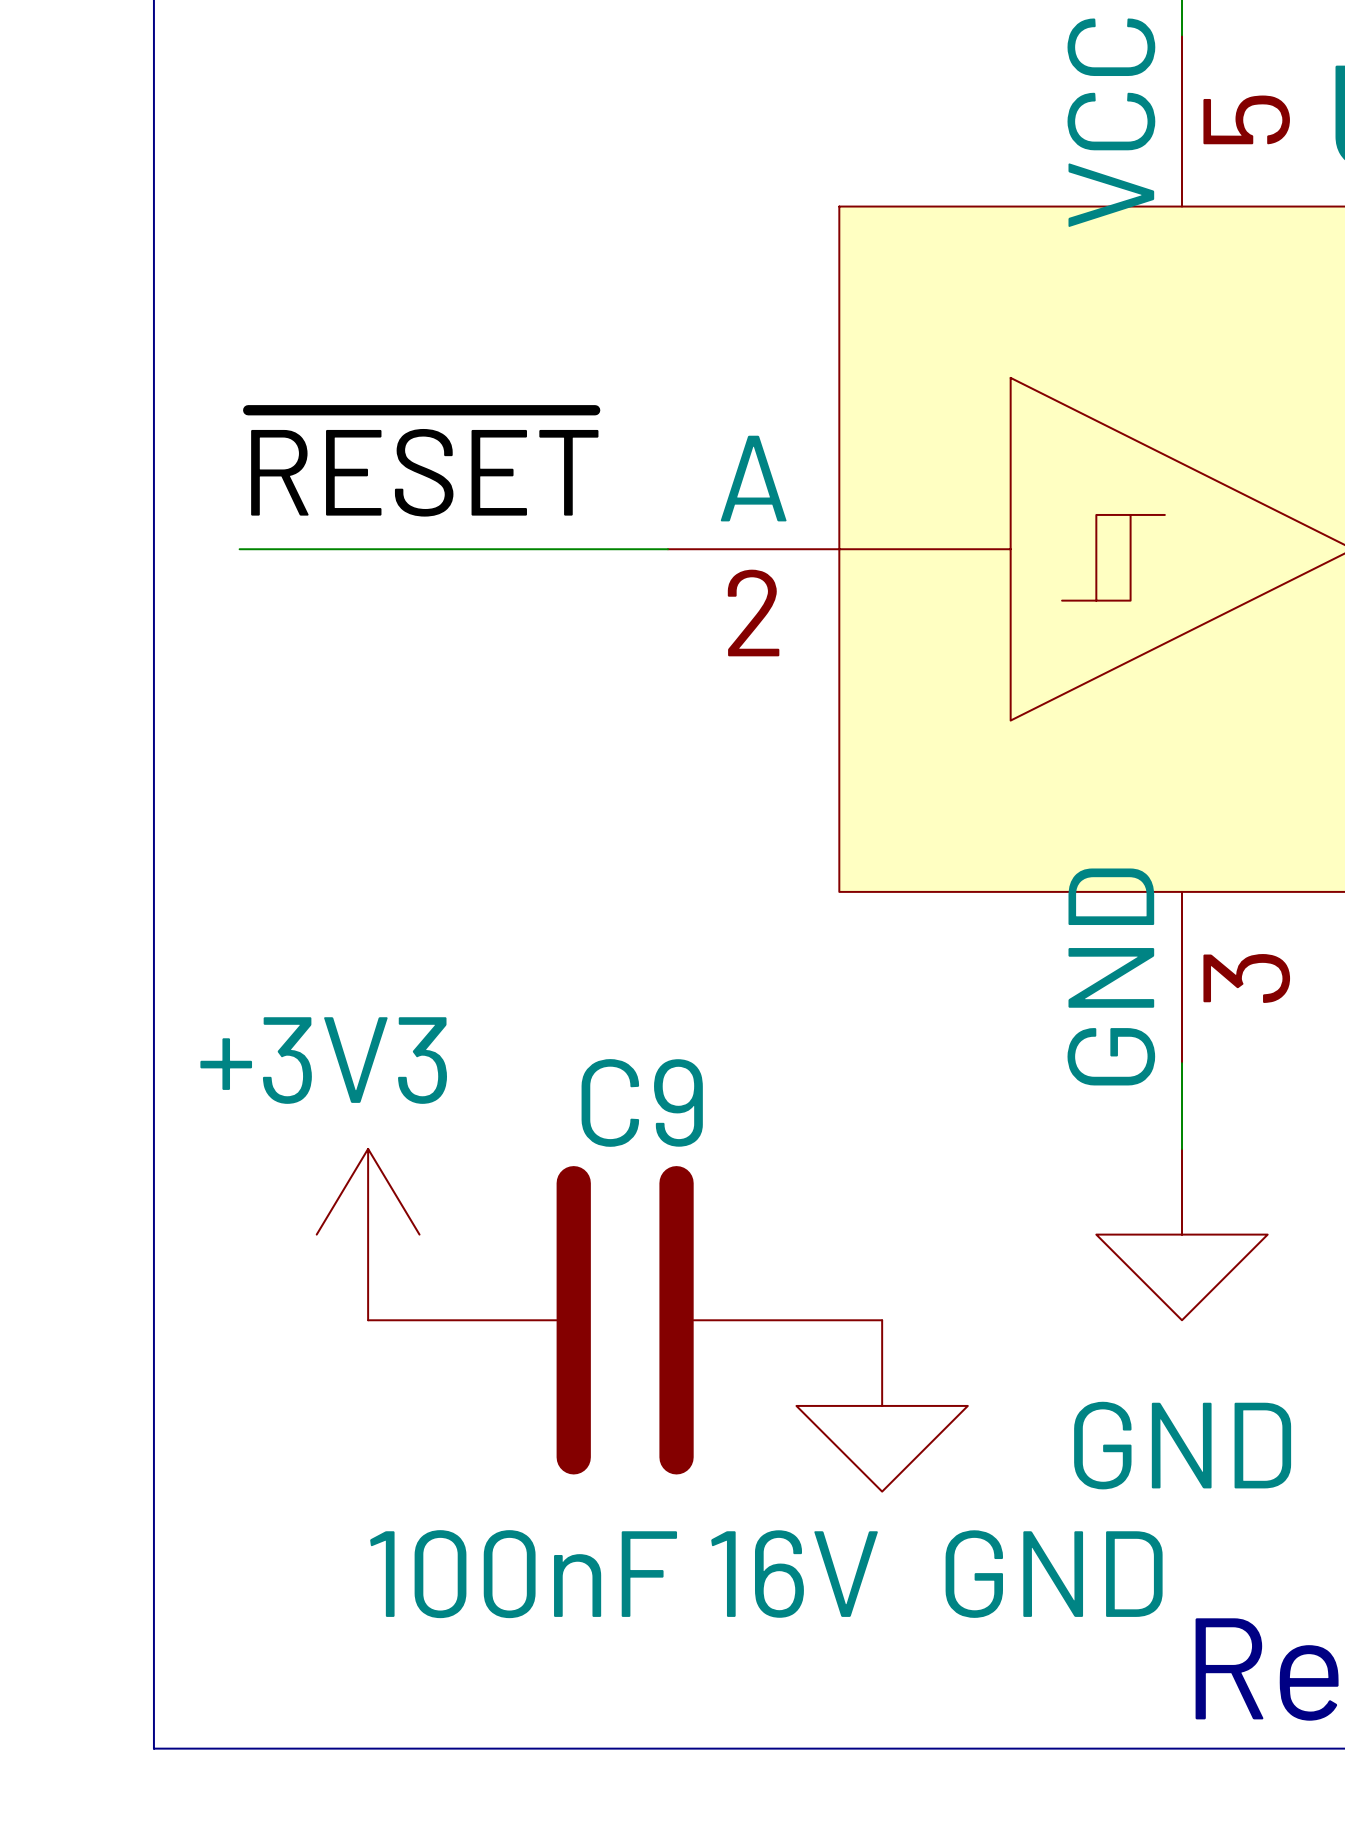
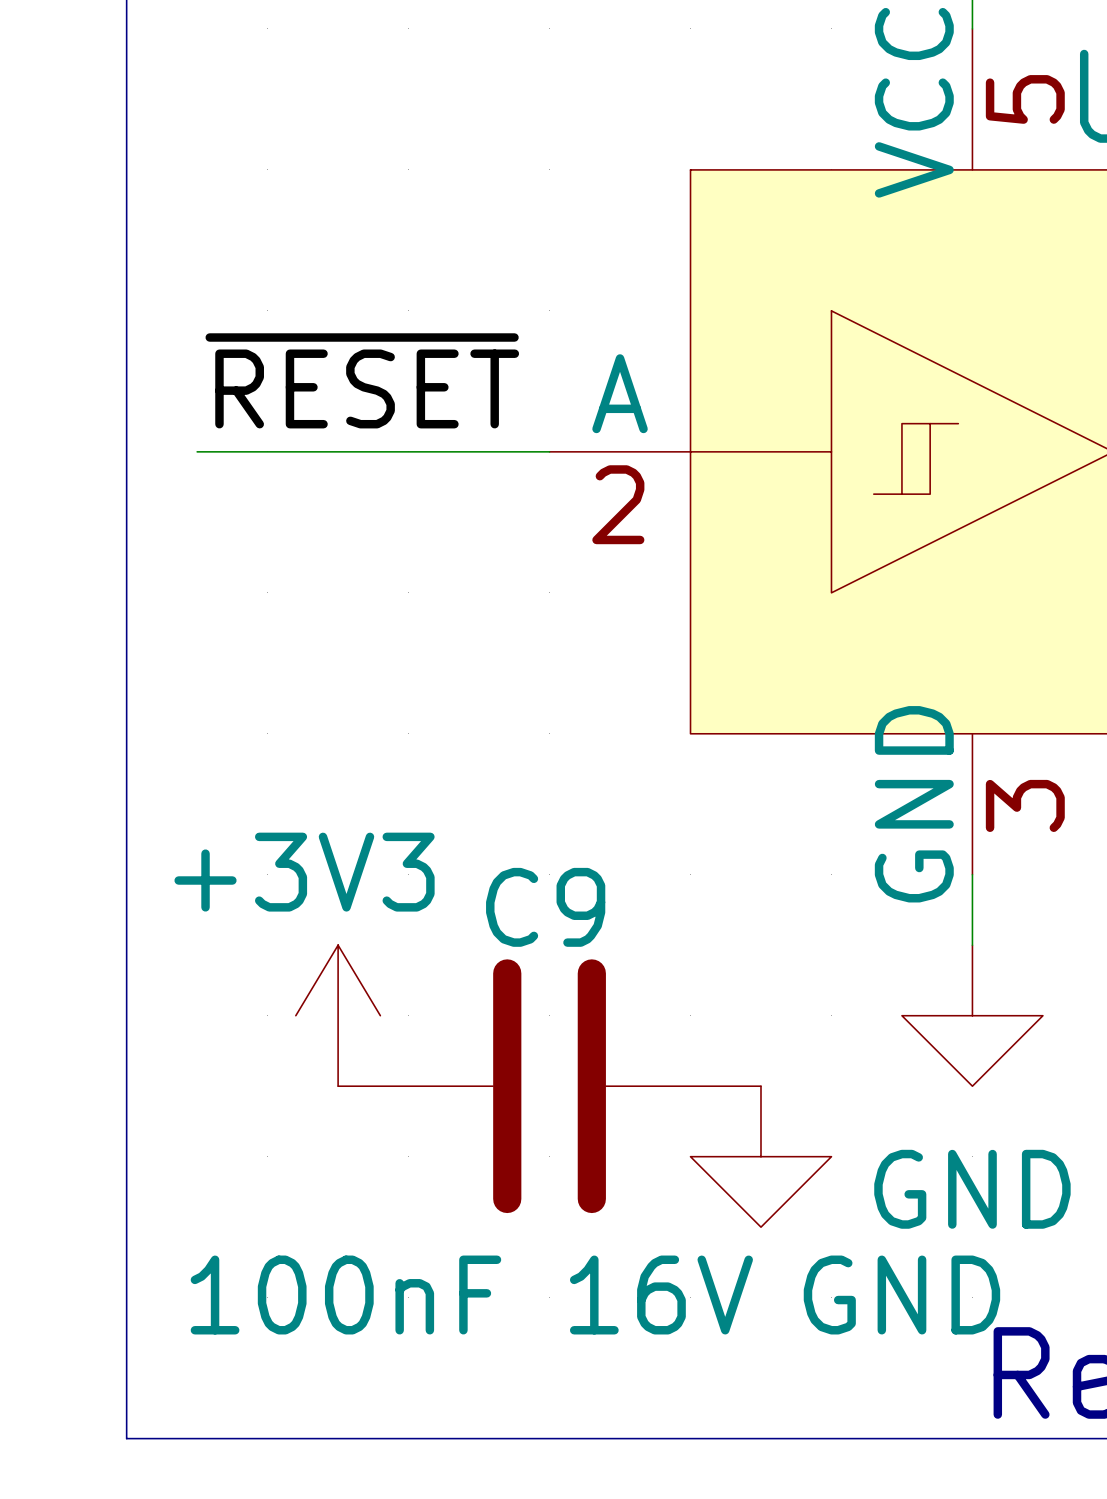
power symbol position: +3V3 (368, 1234) -> +3V3 (338, 1015)
C9 position: (625, 1320) -> (549, 1086)
power symbol position: GND (882, 1405) -> GND (760, 1156)

